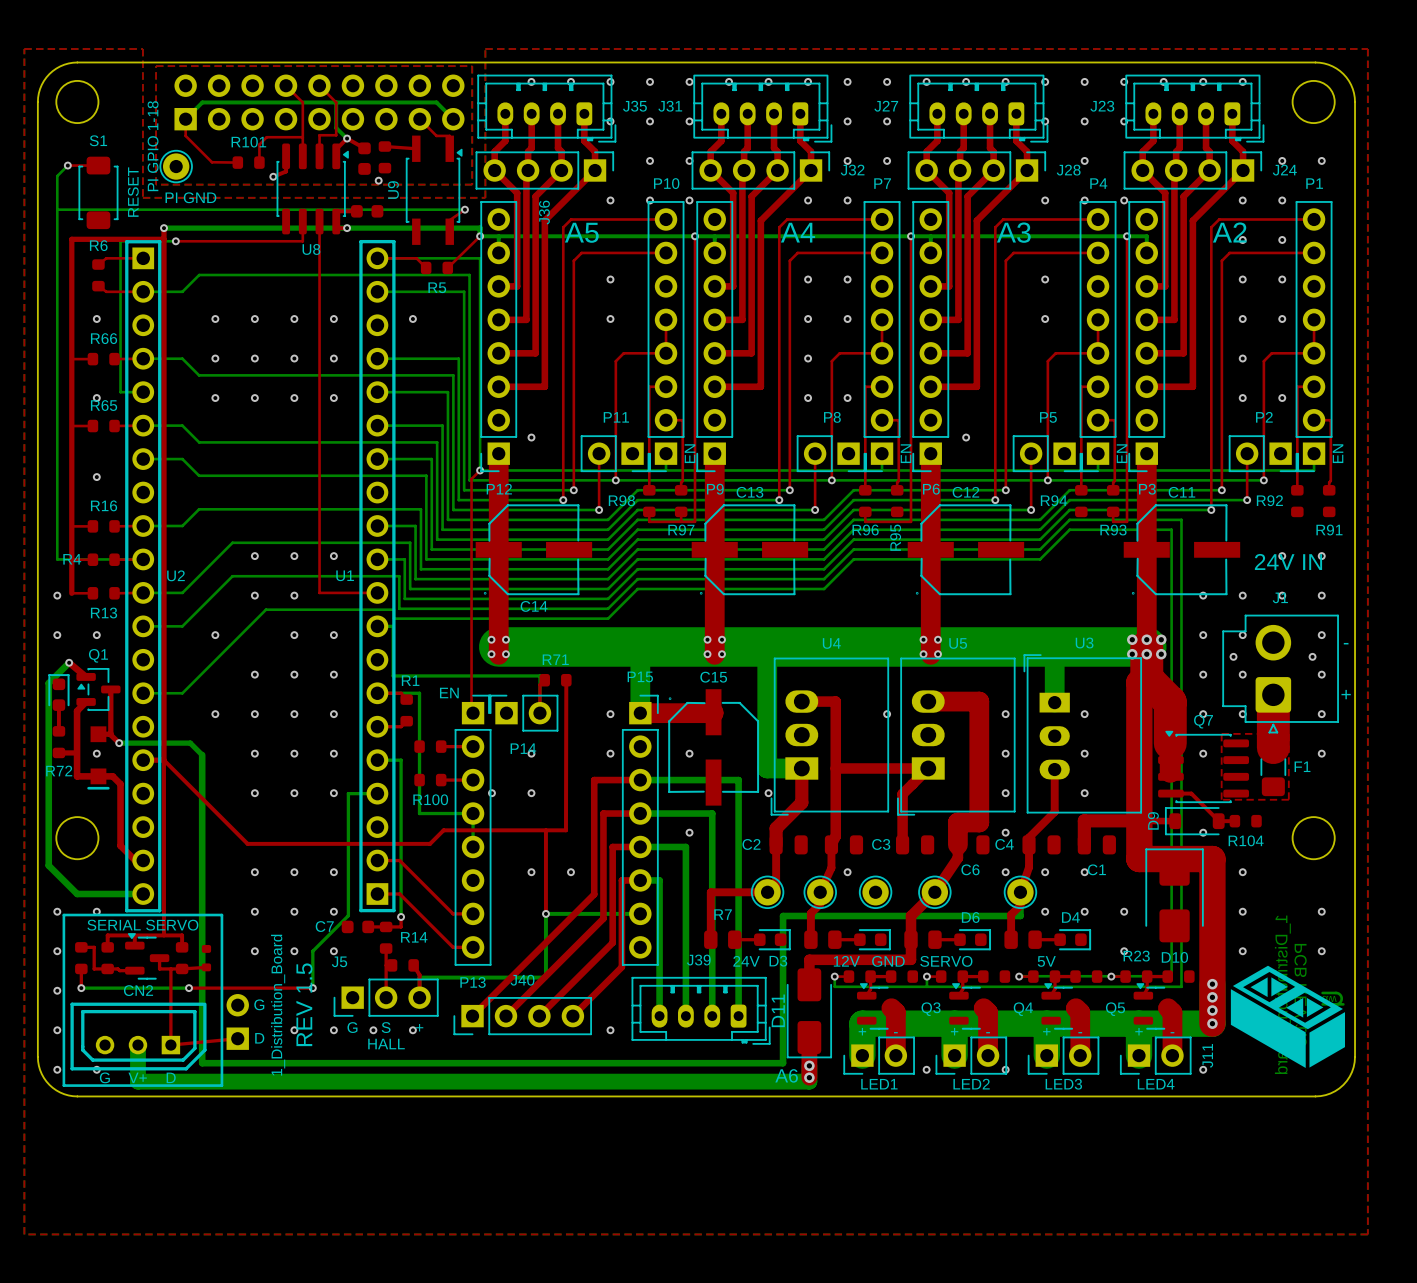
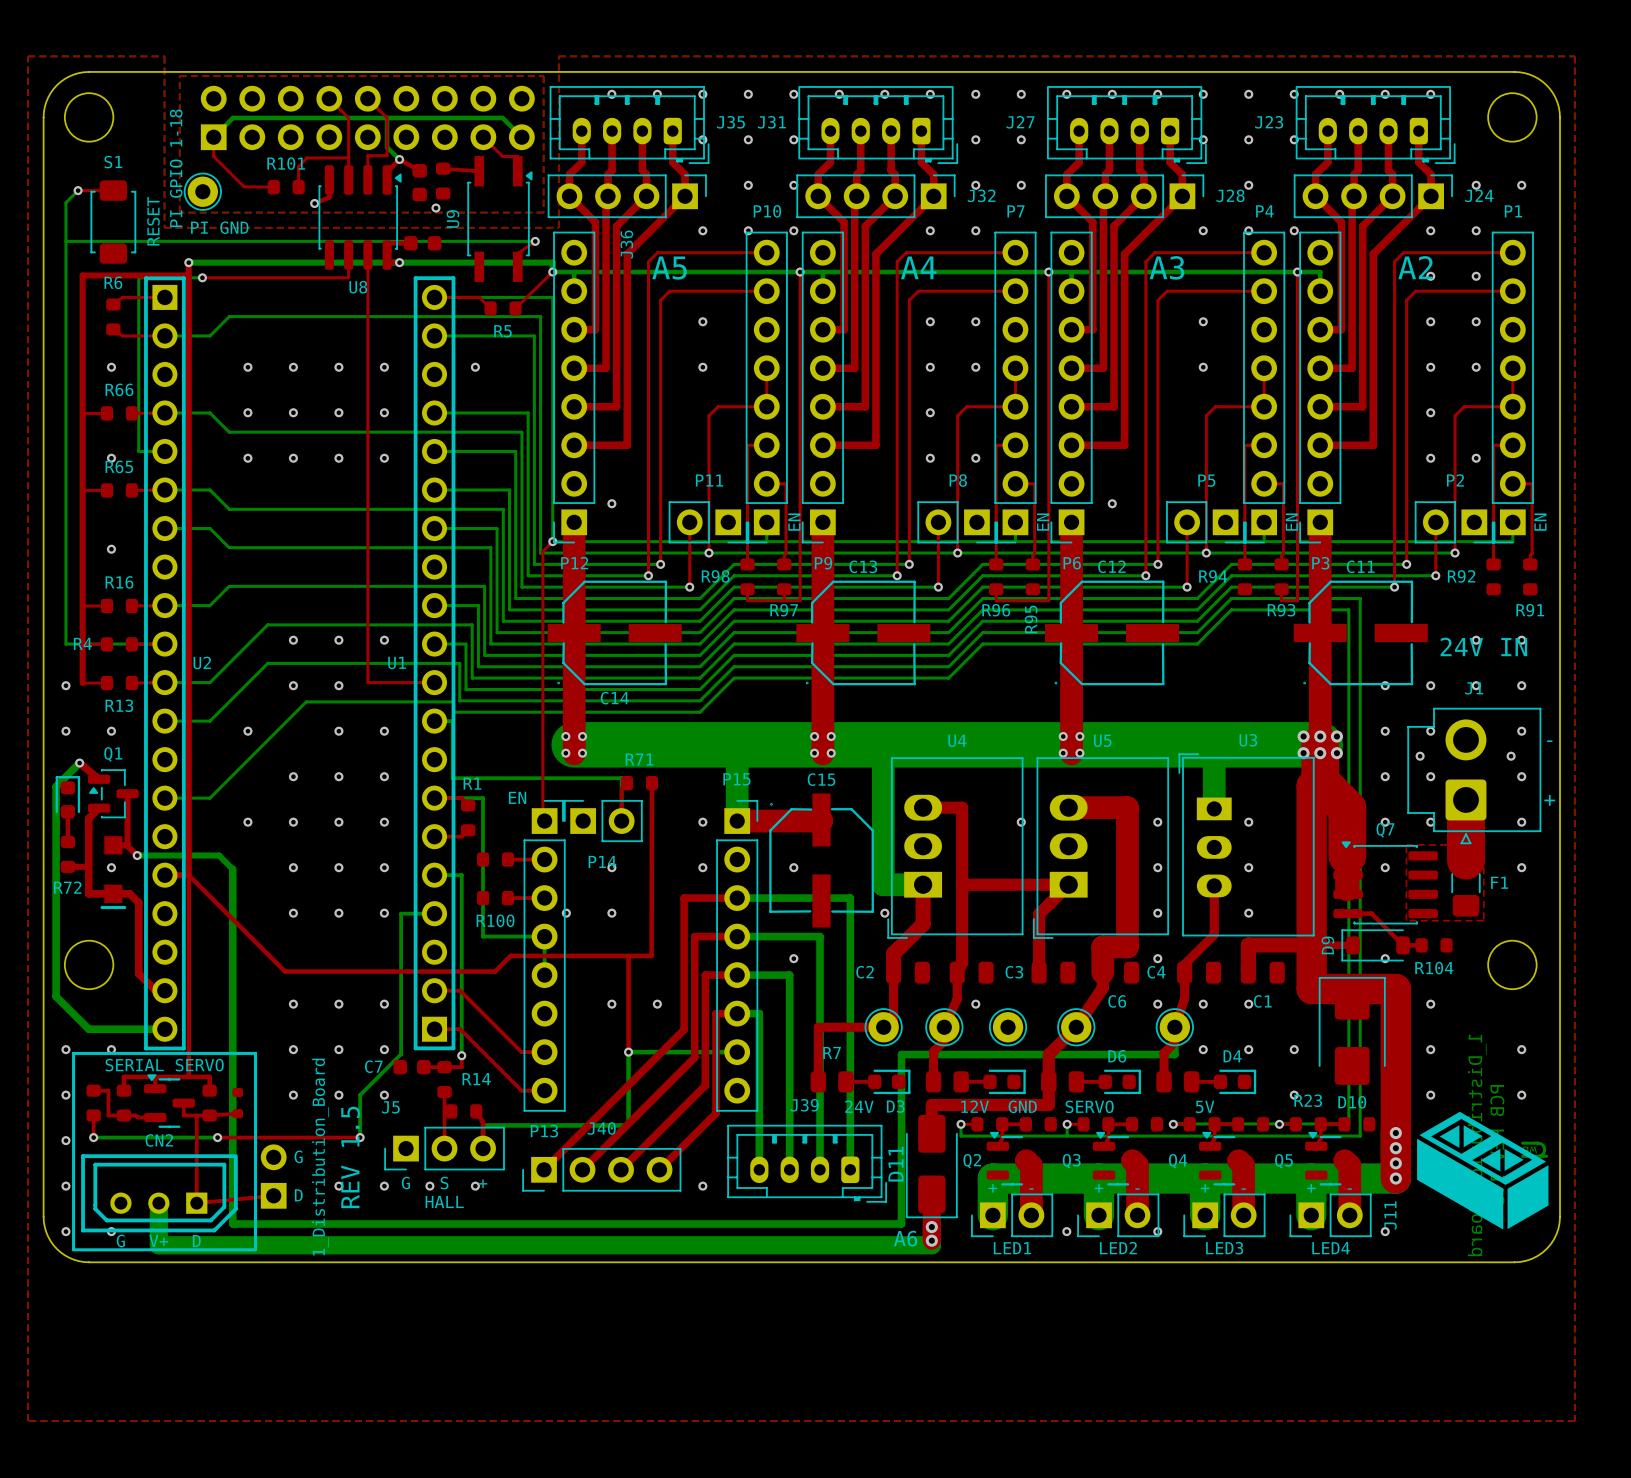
Q2 name: none -> Q2 (972, 1161)

